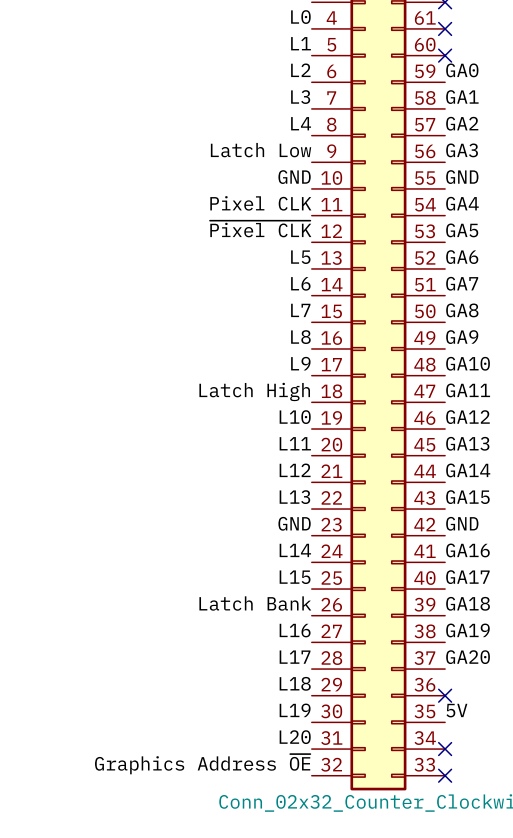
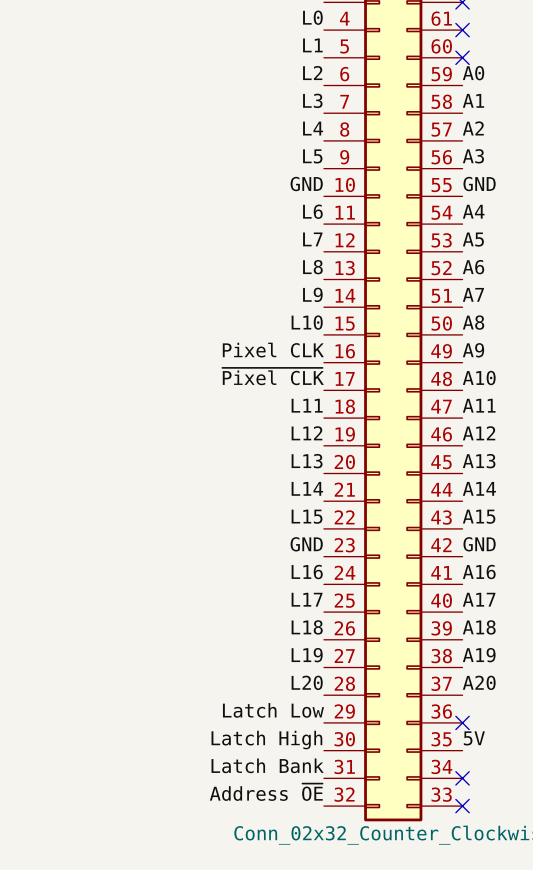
label: GA0 (462, 70) -> A0 (473, 73)
label: GA1 (462, 97) -> A1 (473, 100)
label: GA2 (462, 123) -> A2 (473, 128)
label: Latch Low (261, 150) -> L5 (312, 156)
label: GA3 (462, 150) -> A3 (473, 156)
label: Pixel CLK (260, 203) -> L6 (312, 211)
label: GA4 (462, 203) -> A4 (473, 211)
label: ~{Pixel CLK} (260, 228) -> L7 (312, 239)
label: GA5 (462, 230) -> A5 (473, 239)
label: L5 (300, 257) -> L8 (312, 267)
label: GA6 (462, 257) -> A6 (473, 267)
label: L6 (300, 283) -> L9 (312, 294)
label: GA7 (462, 283) -> A7 (473, 294)
label: L7 (300, 310) -> L10 (307, 322)
label: GA8 (462, 310) -> A8 (473, 322)
label: L8 (300, 337) -> Pixel CLK (273, 350)
label: GA9 (462, 337) -> A9 (473, 350)
label: L9 (300, 363) -> ~{Pixel CLK} (273, 376)
label: GA10 (468, 363) -> A10 (479, 378)
label: GA11 (468, 390) -> A11 (479, 405)
label: Latch High (254, 391) -> L11 (307, 405)
label: L10 (295, 417) -> L12 (306, 433)
label: GA12 (467, 417) -> A12 (479, 433)
label: L11 (295, 443) -> L13 (307, 461)
label: GA13 (467, 443) -> A13 (479, 461)
label: L12 (295, 470) -> L14 (307, 488)
label: GA14 (468, 470) -> A14 (479, 488)
label: L13 (294, 497) -> L15 (307, 516)
label: GA15 (467, 497) -> A15 (479, 516)
label: L14 (295, 550) -> L16 (307, 572)
label: GA16 (467, 550) -> A16 (479, 572)
label: L15 (295, 577) -> L17 (307, 599)
label: GA17 (467, 577) -> A17 (479, 599)
label: Latch Bank (255, 603) -> L18 (307, 627)
label: GA18 (468, 603) -> A18 (479, 627)
label: L16 (295, 630) -> L19 (307, 655)
label: GA19 (467, 630) -> A19 (479, 655)
label: L17 (295, 657) -> L20 (307, 682)
label: GA20 (468, 657) -> A20 (479, 682)
label: L18 (295, 683) -> Latch Low (273, 710)
label: L19 (295, 710) -> Latch High (266, 740)
label: L20 (295, 737) -> Latch Bank (267, 765)
label: Graphics Address ~{OE} (202, 764) -> Address ~{OE} (266, 792)

